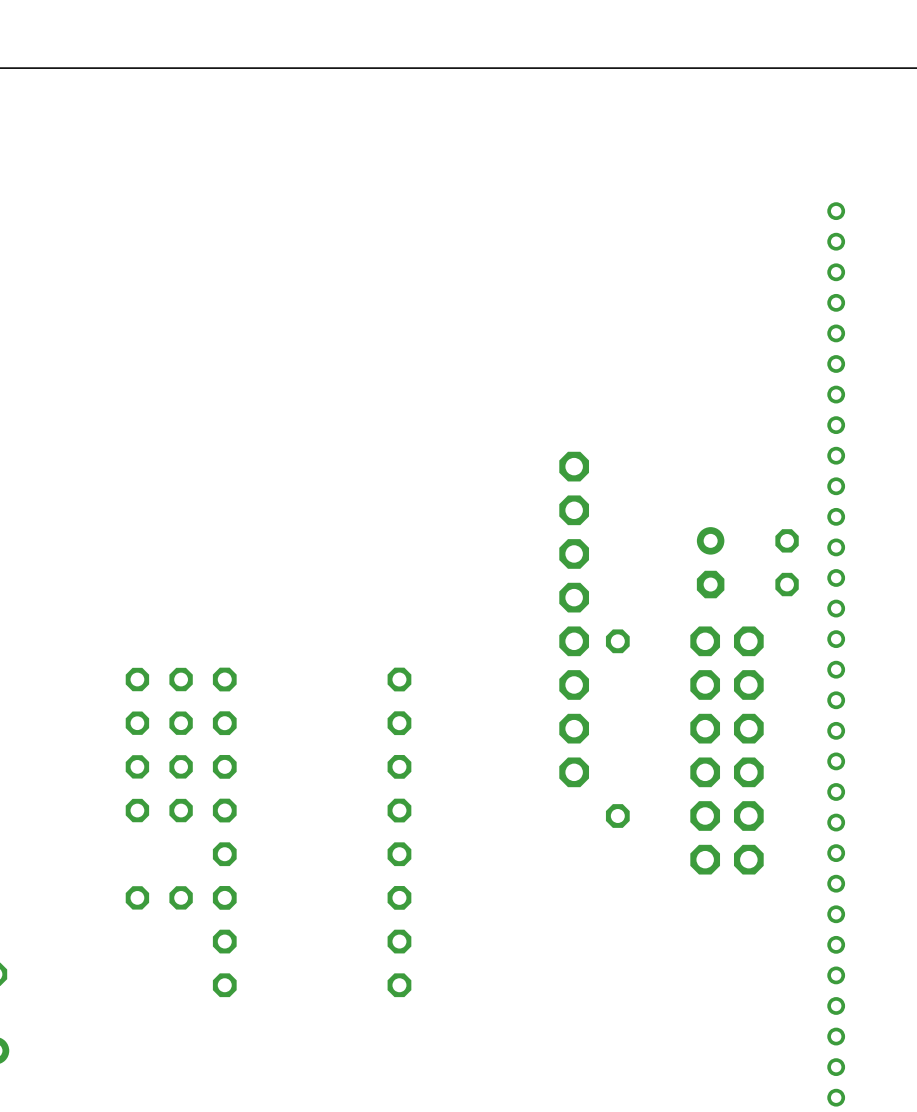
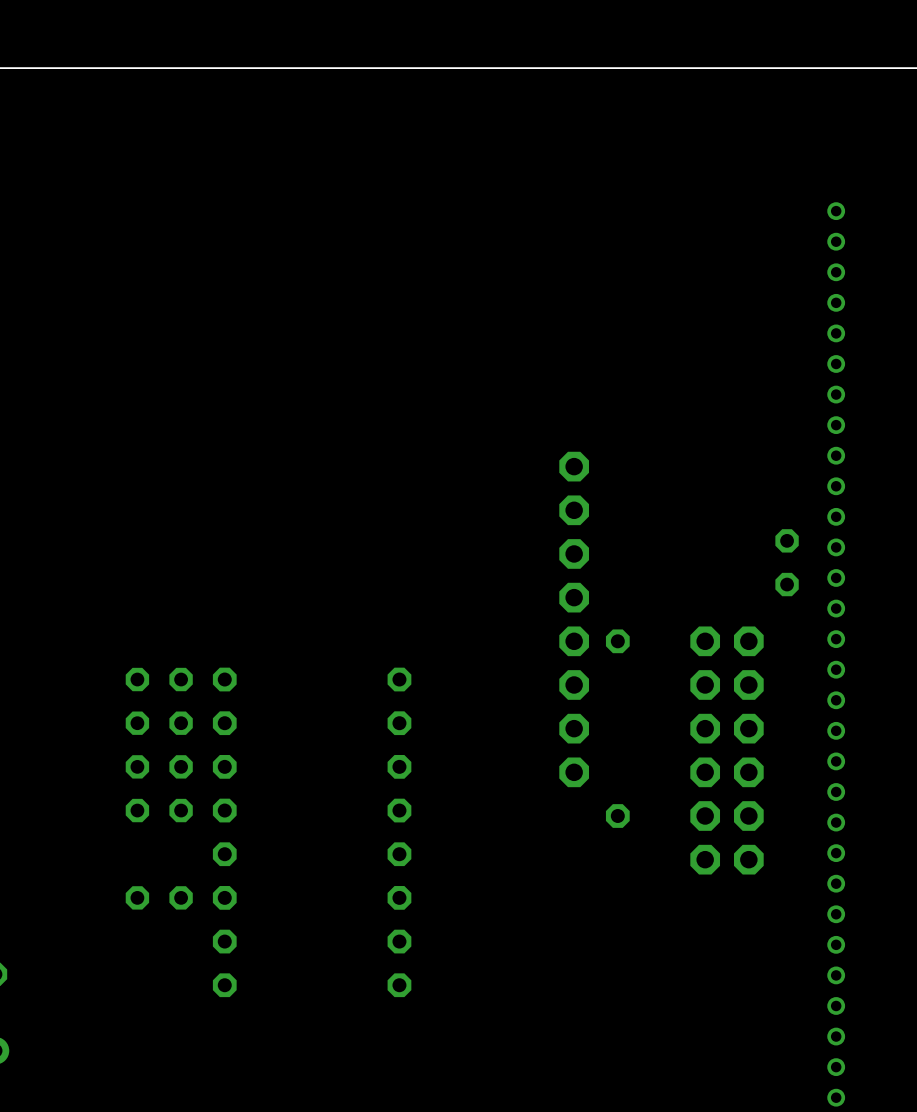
part: (710, 562) -> none

